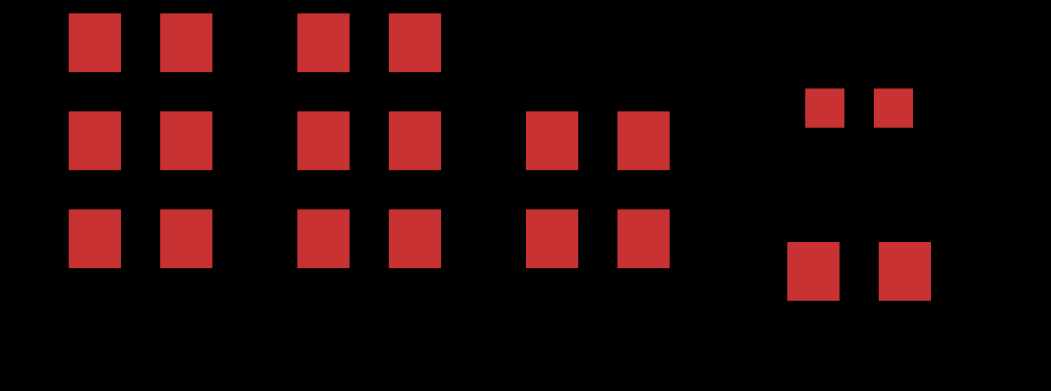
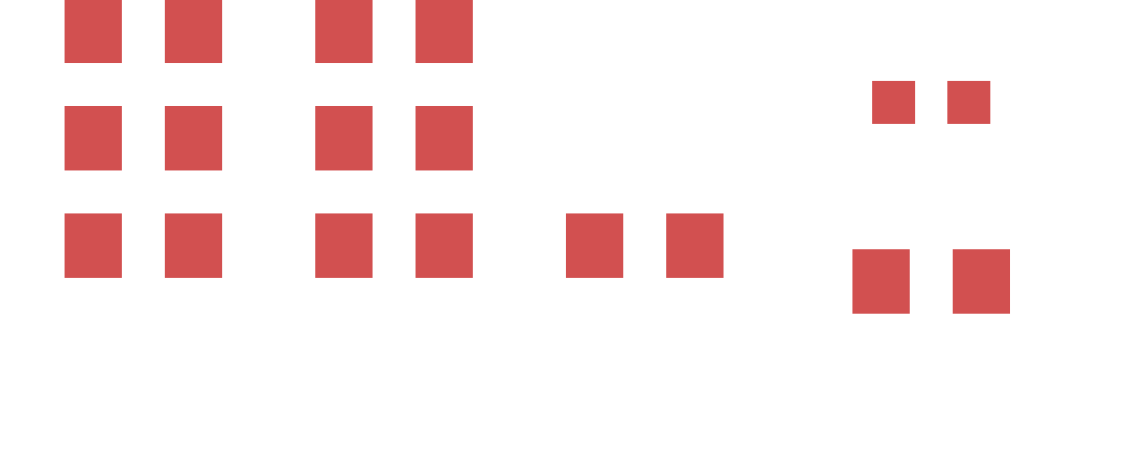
part: (597, 140) -> none

